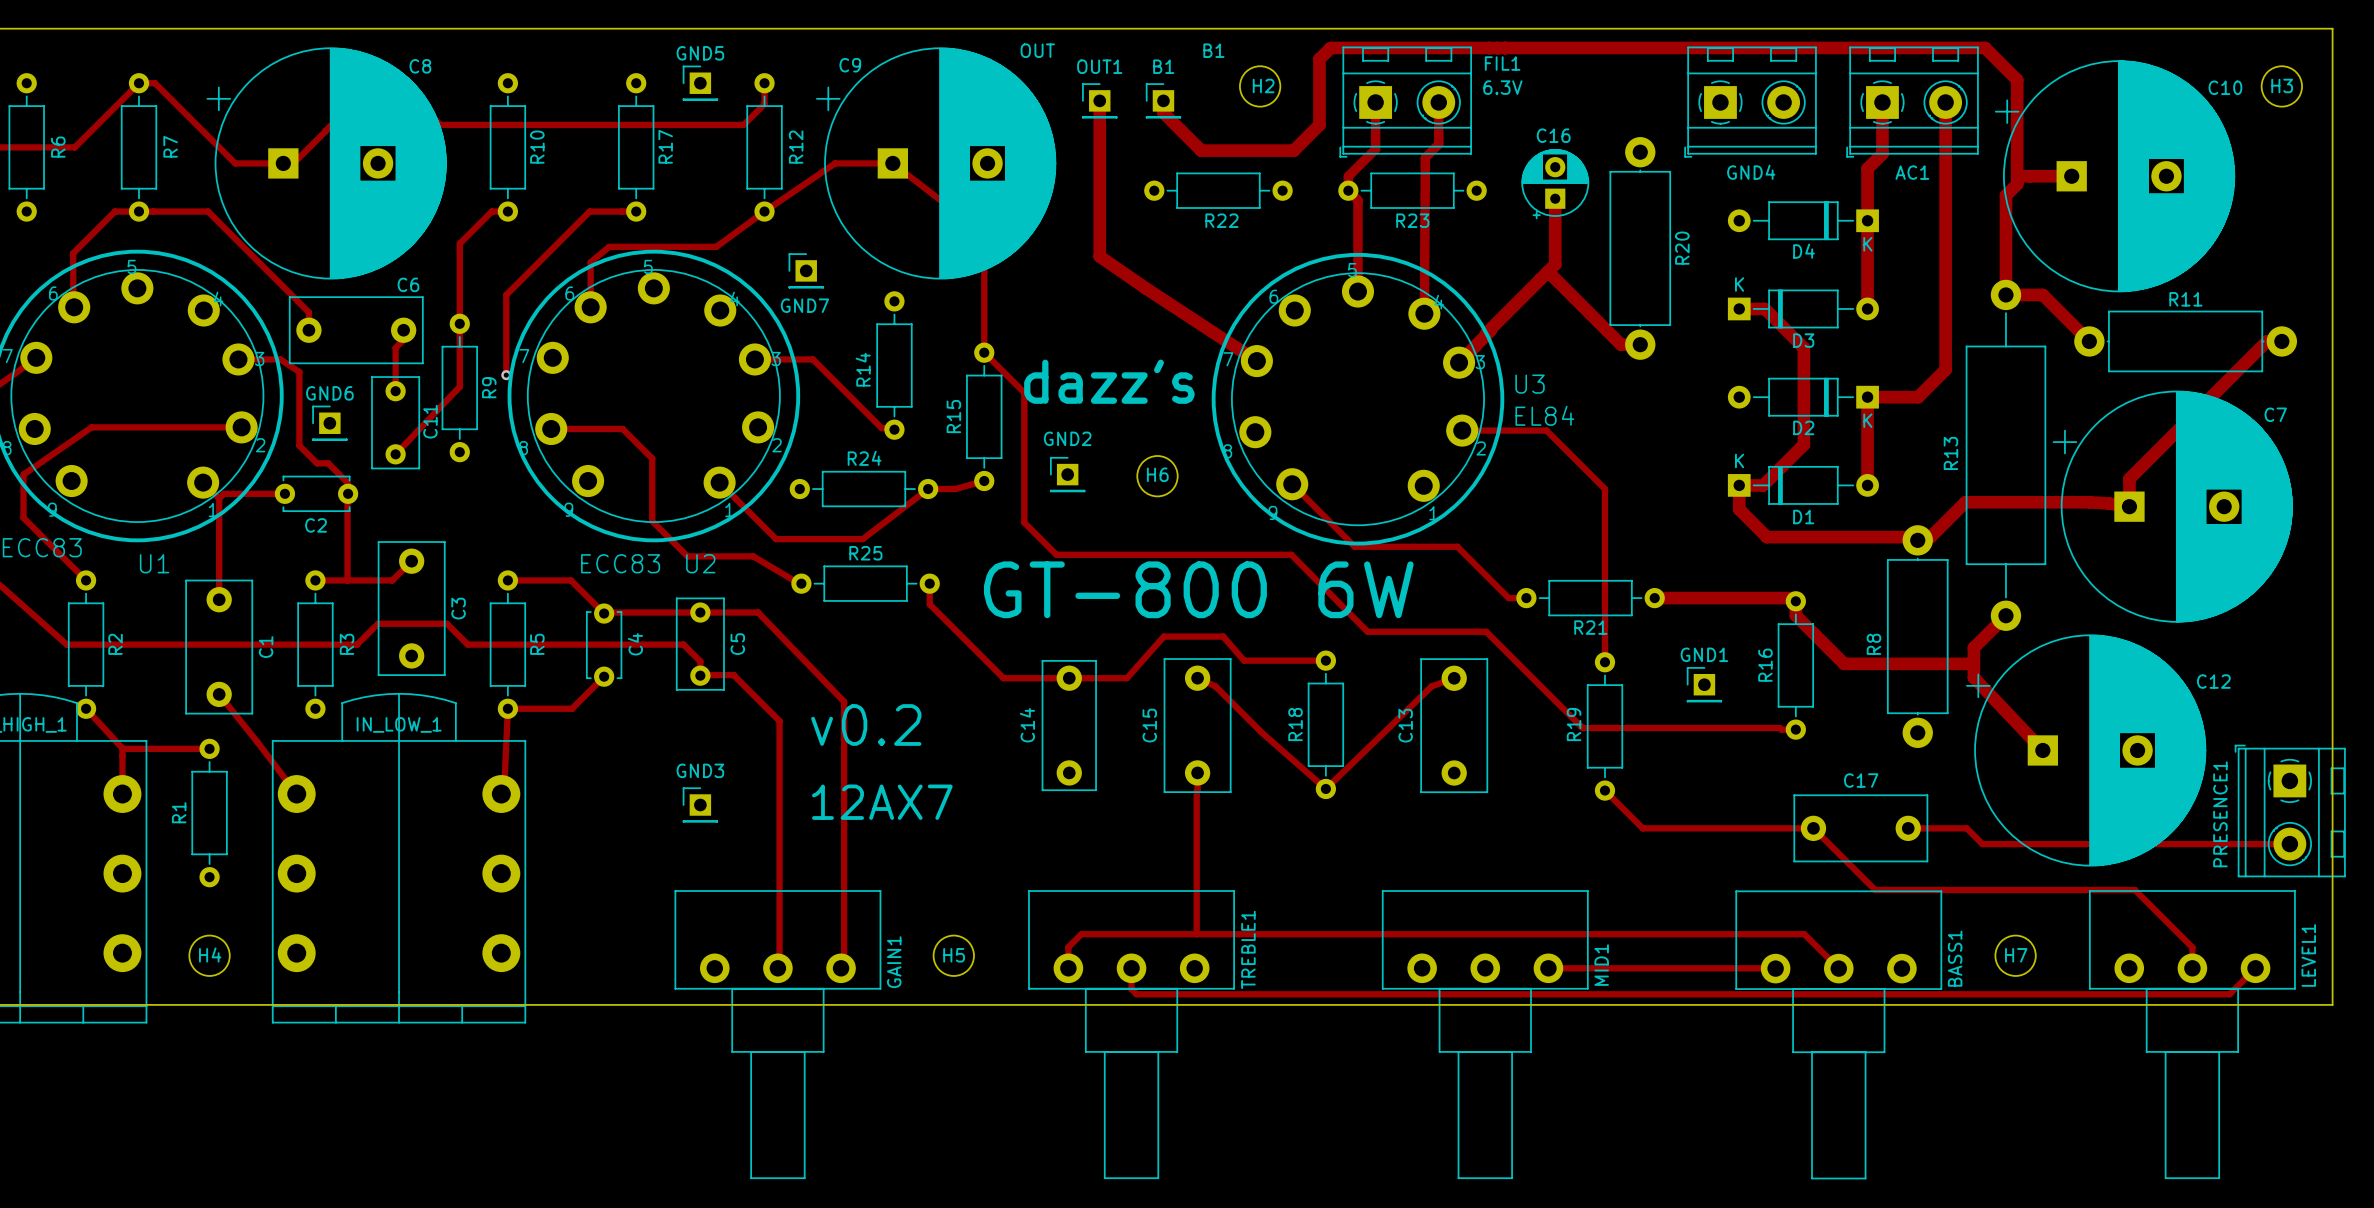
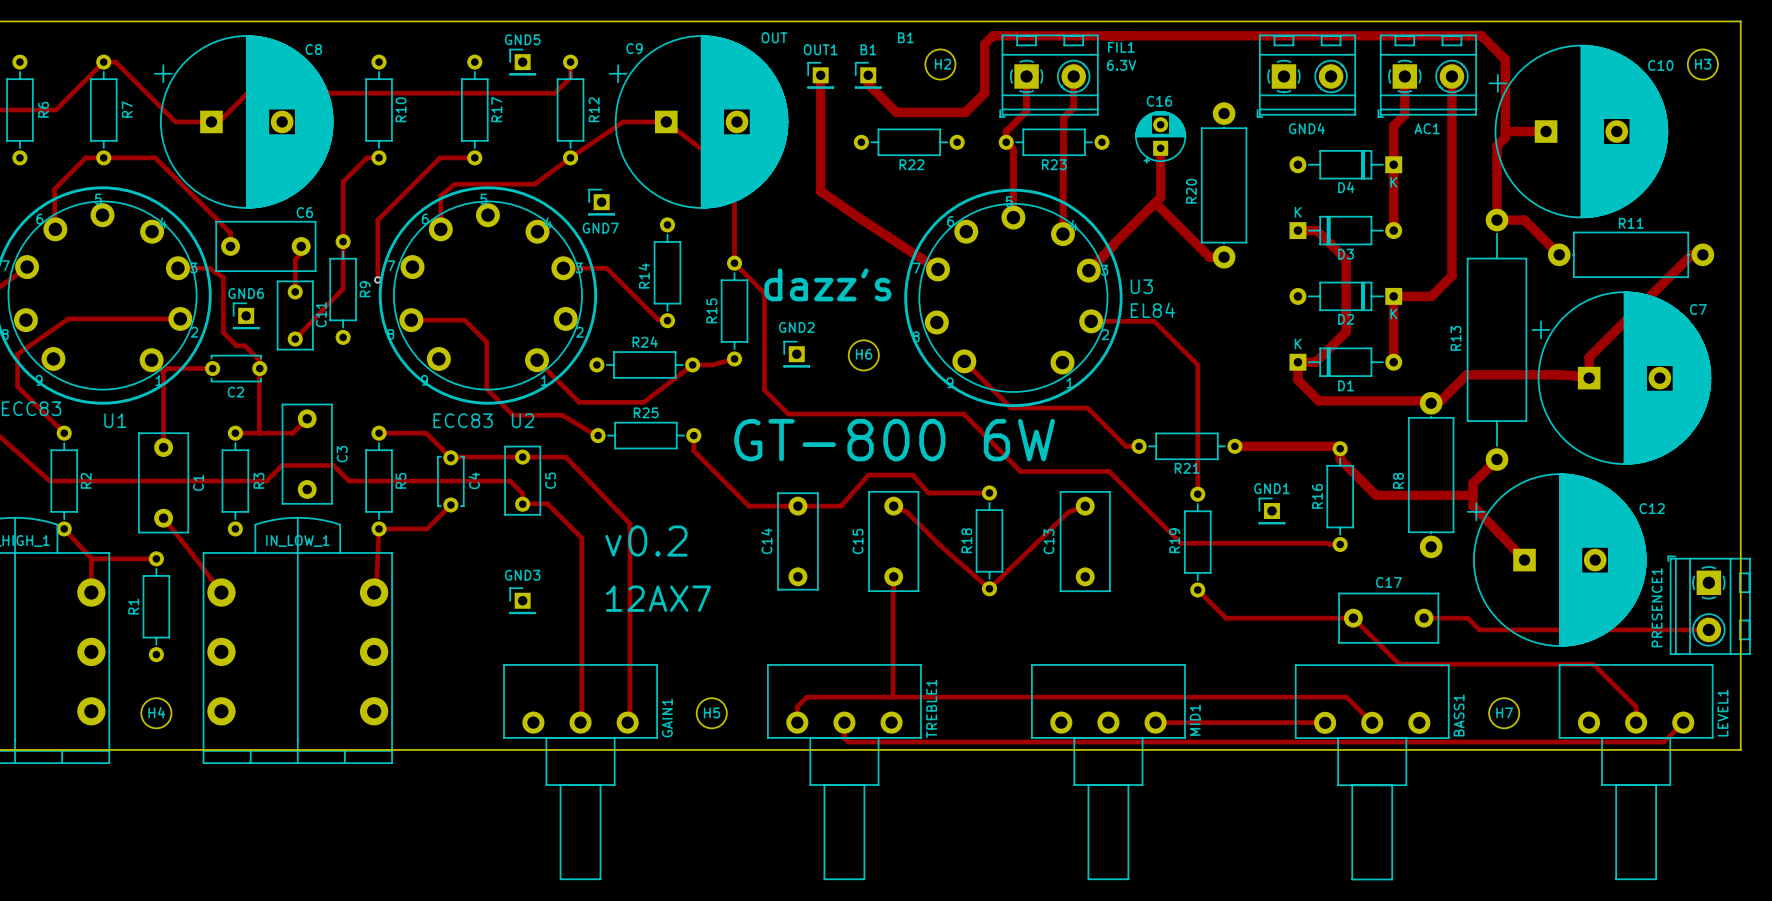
R20 name position: R20 (1682, 248) -> R20 (1191, 191)

